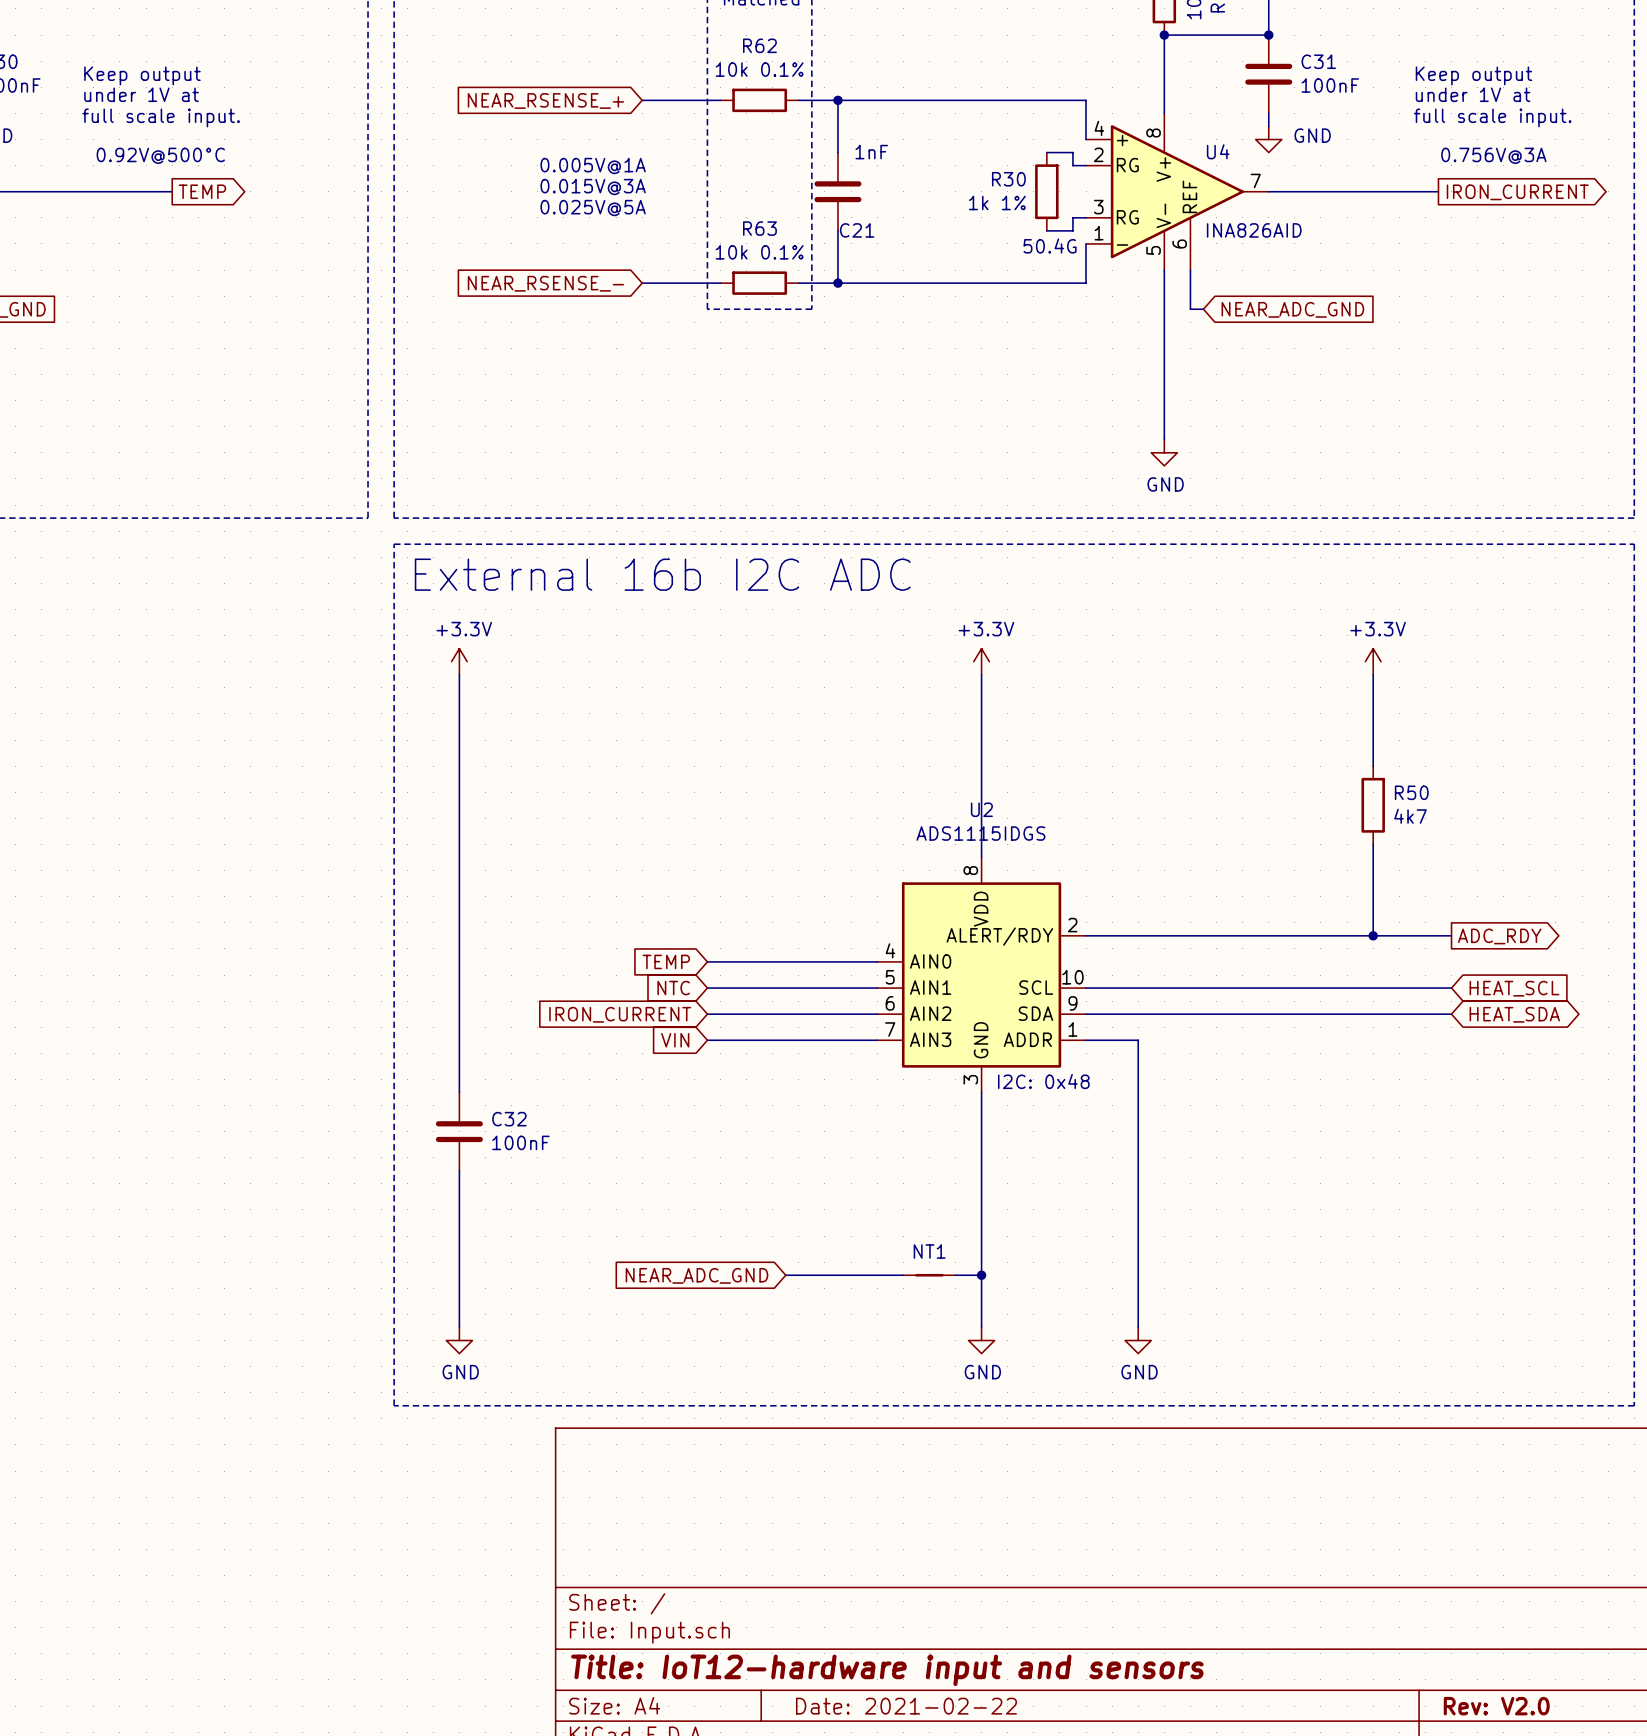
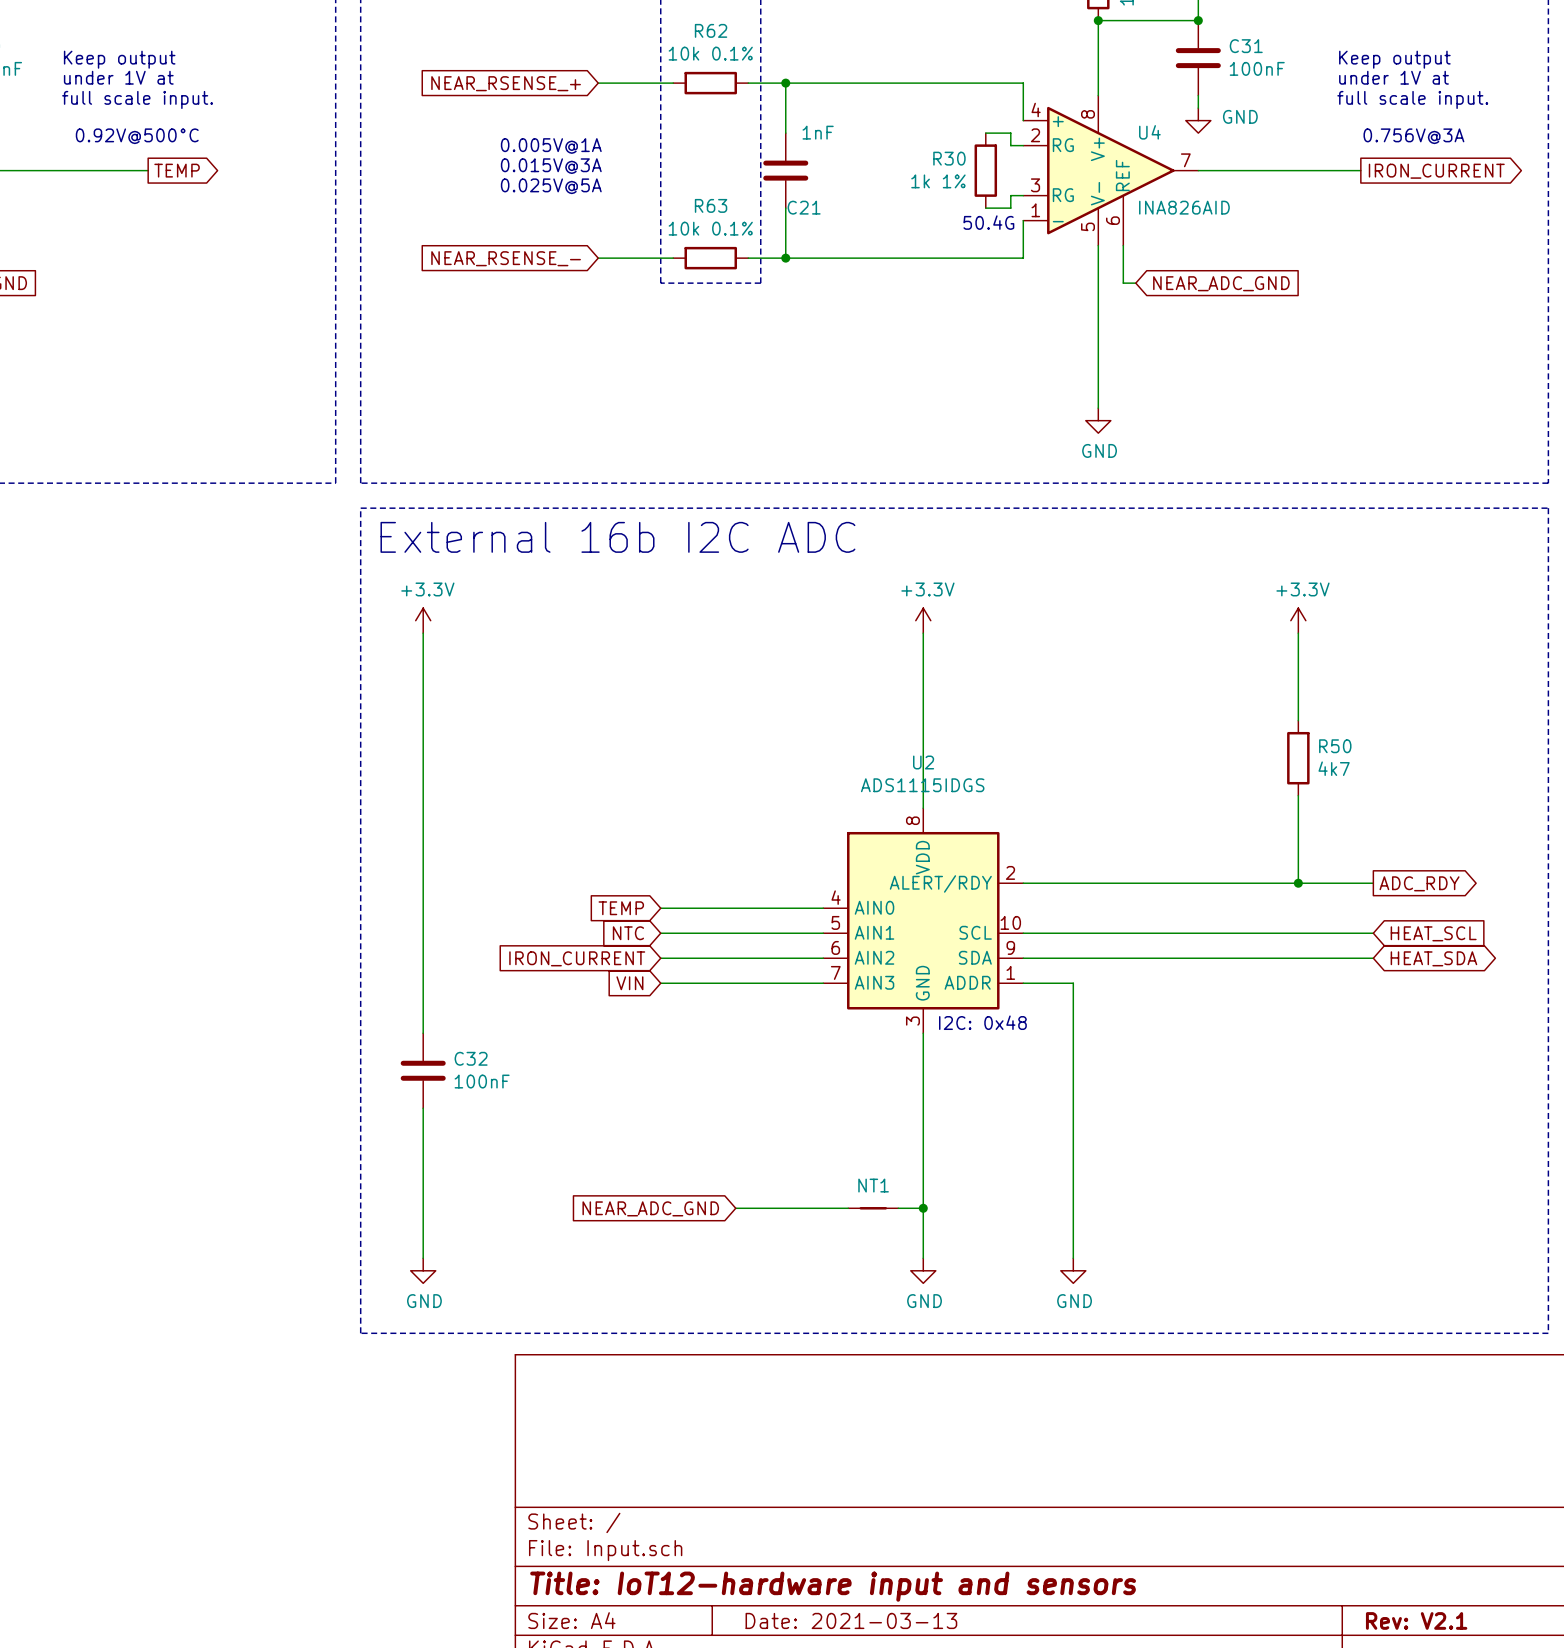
title block: Date: 2021-02-22 (906, 1706) -> Date: 2021-03-13 (851, 1620)
title block: Rev: V2.0 (1496, 1706) -> Rev: V2.1 (1416, 1620)

